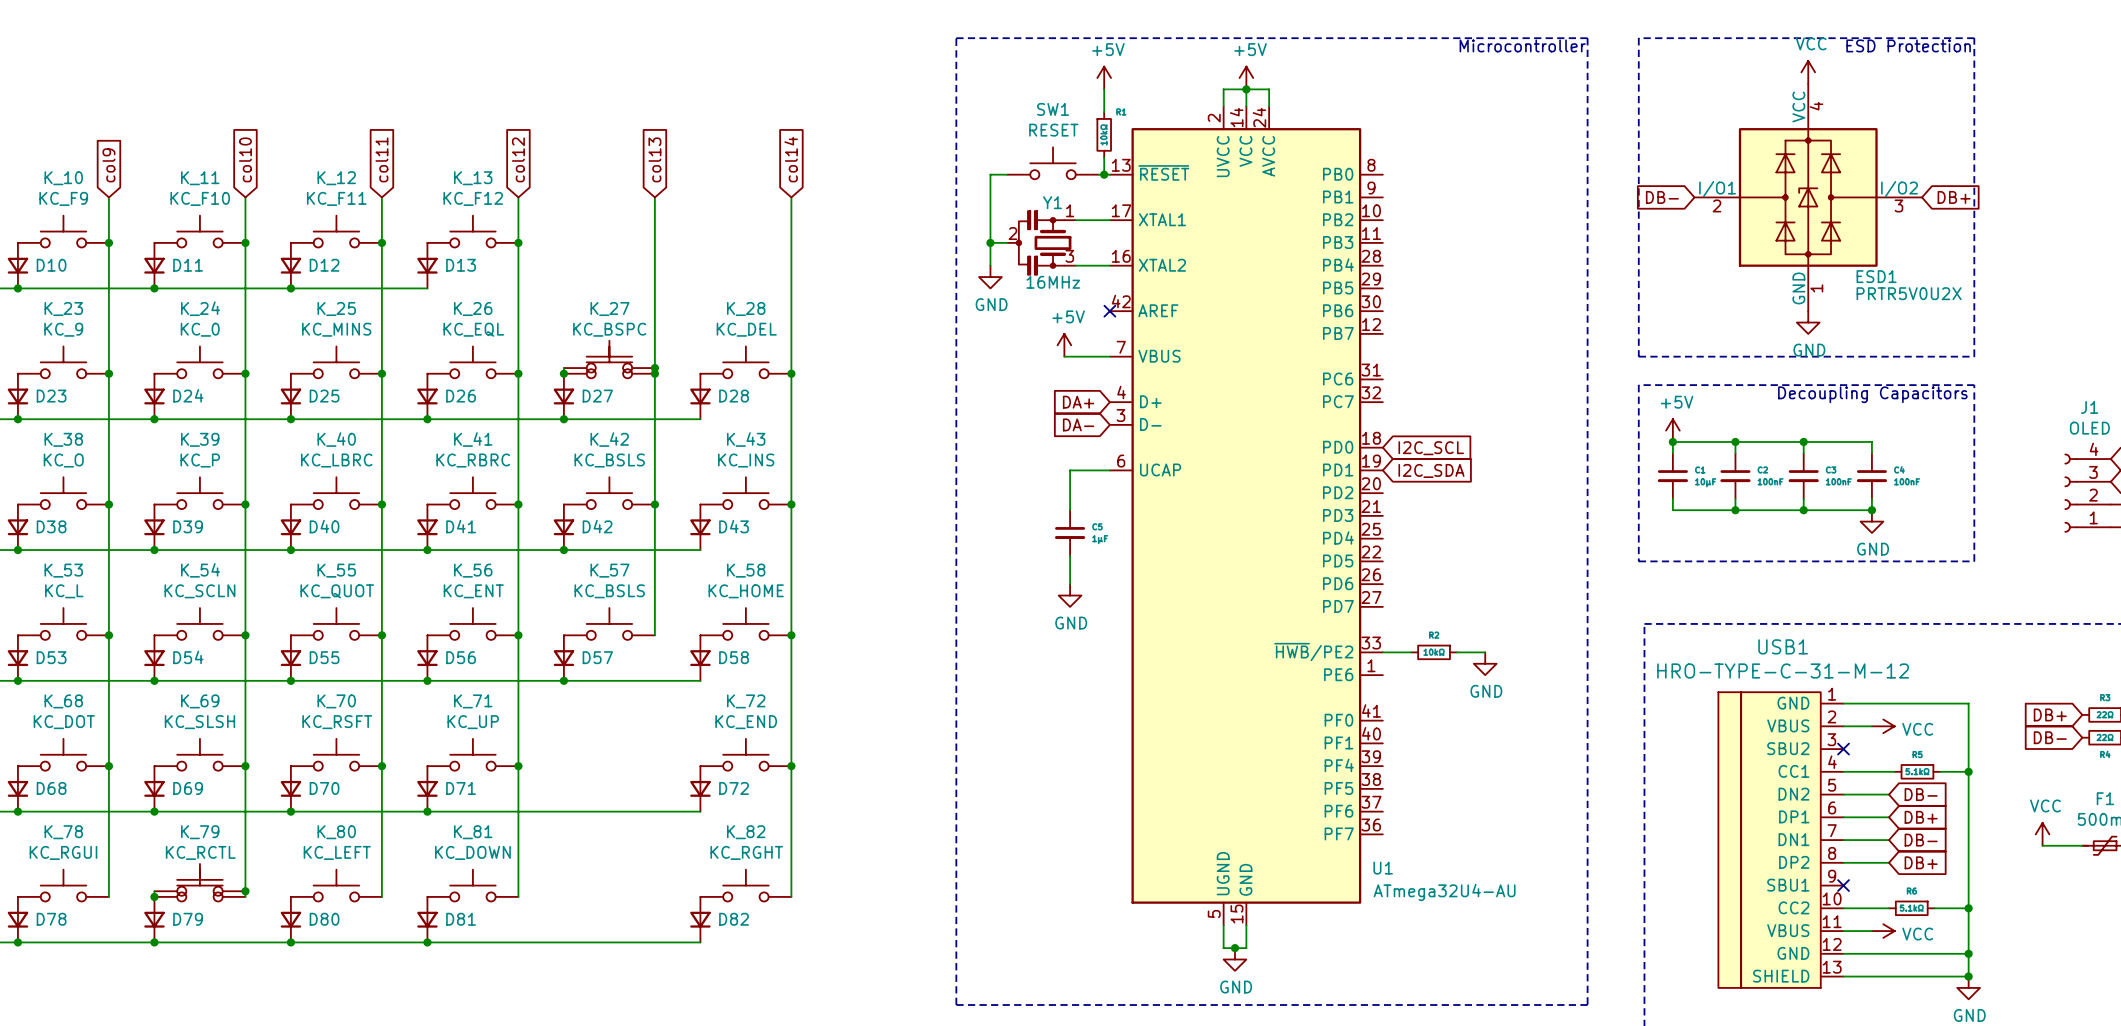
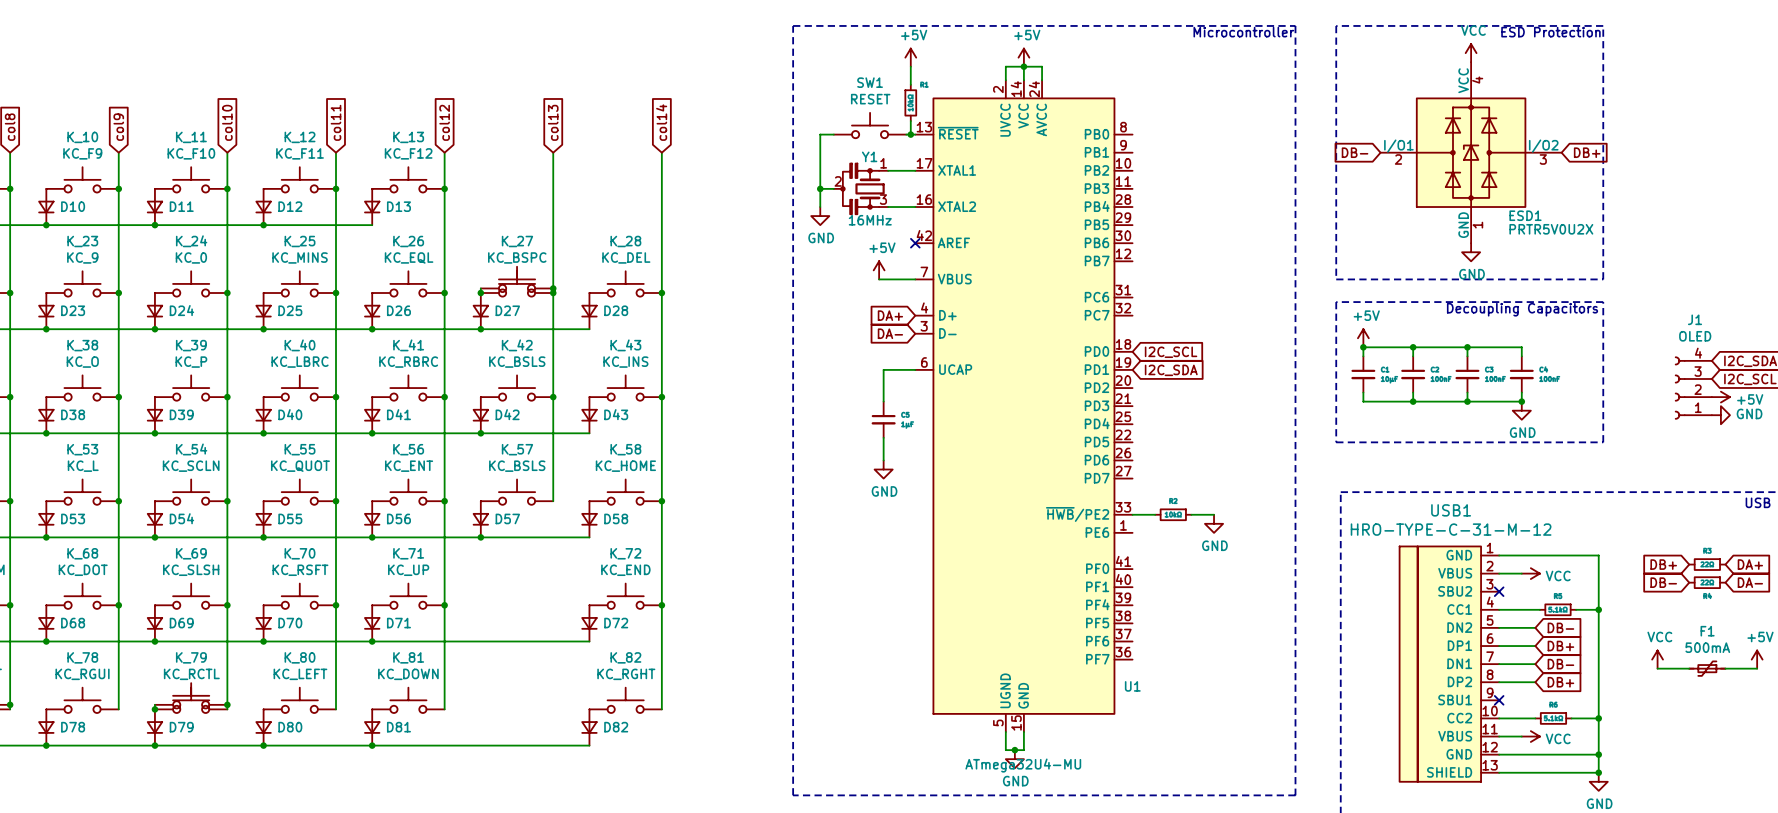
U1 value: ATmega32U4-AU (1444, 892) -> ATmega32U4-MU (1023, 765)

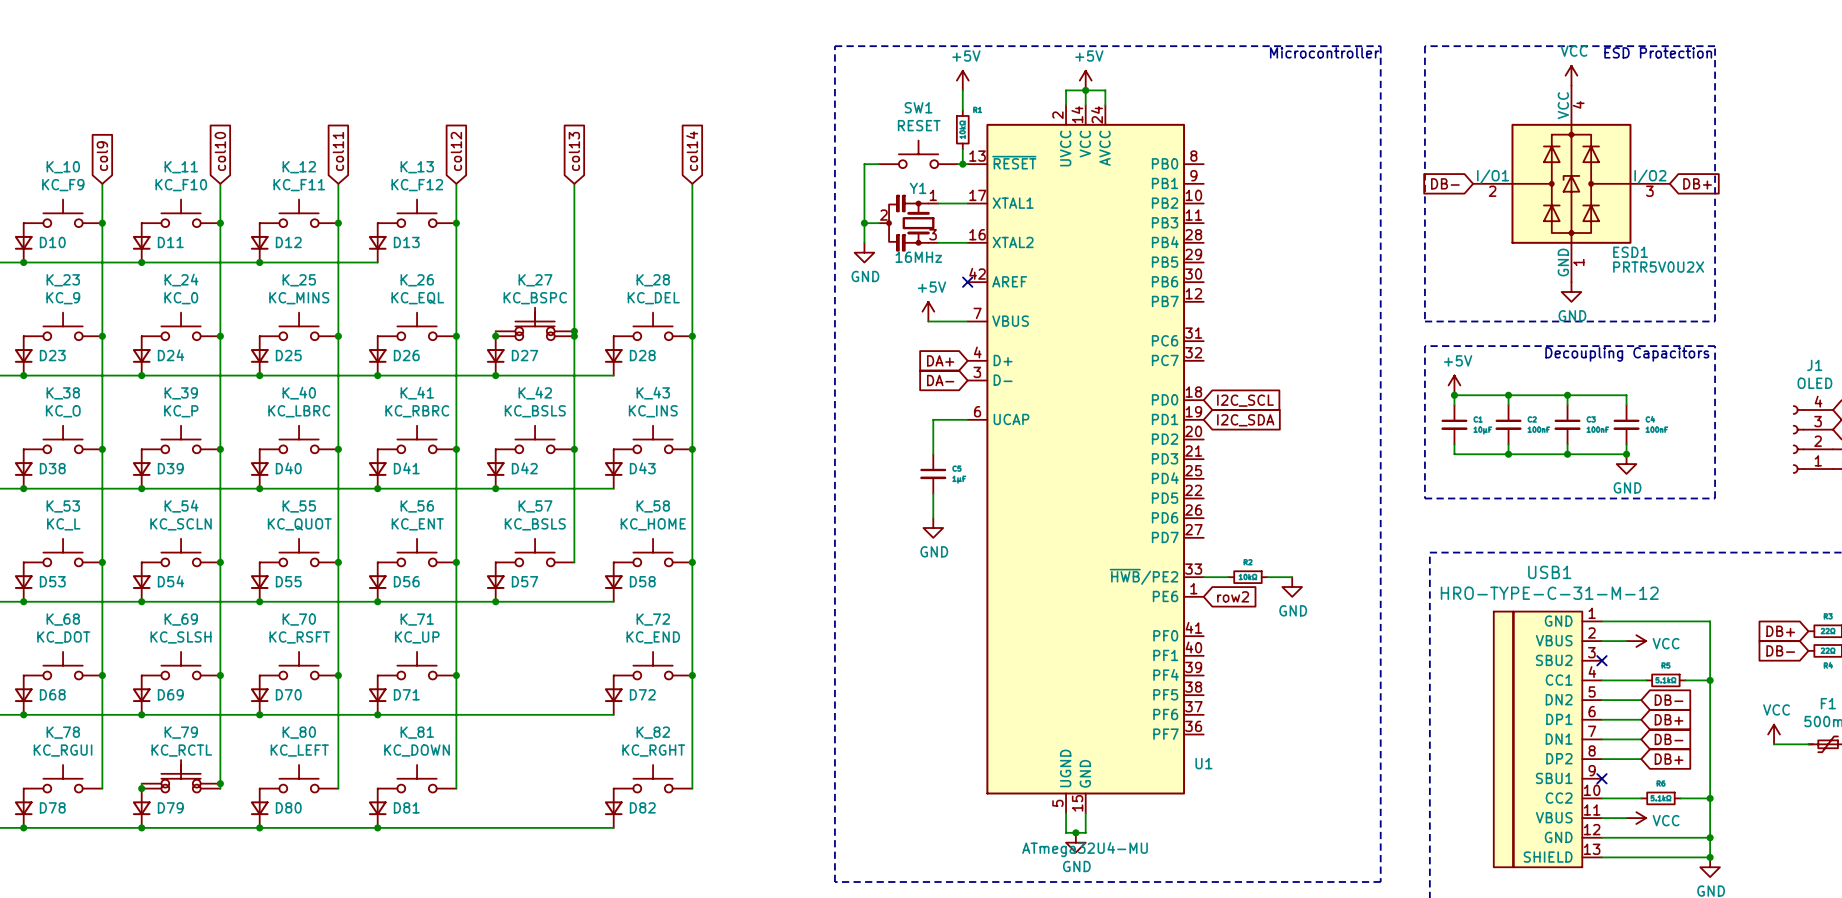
global label: none -> row2 (1233, 596)

